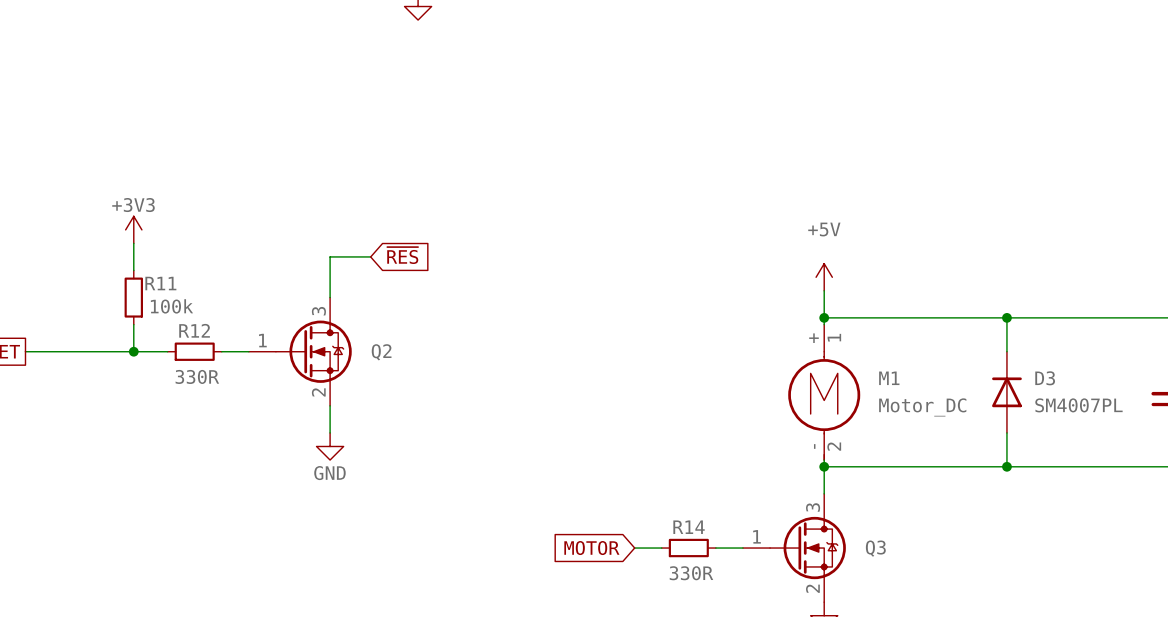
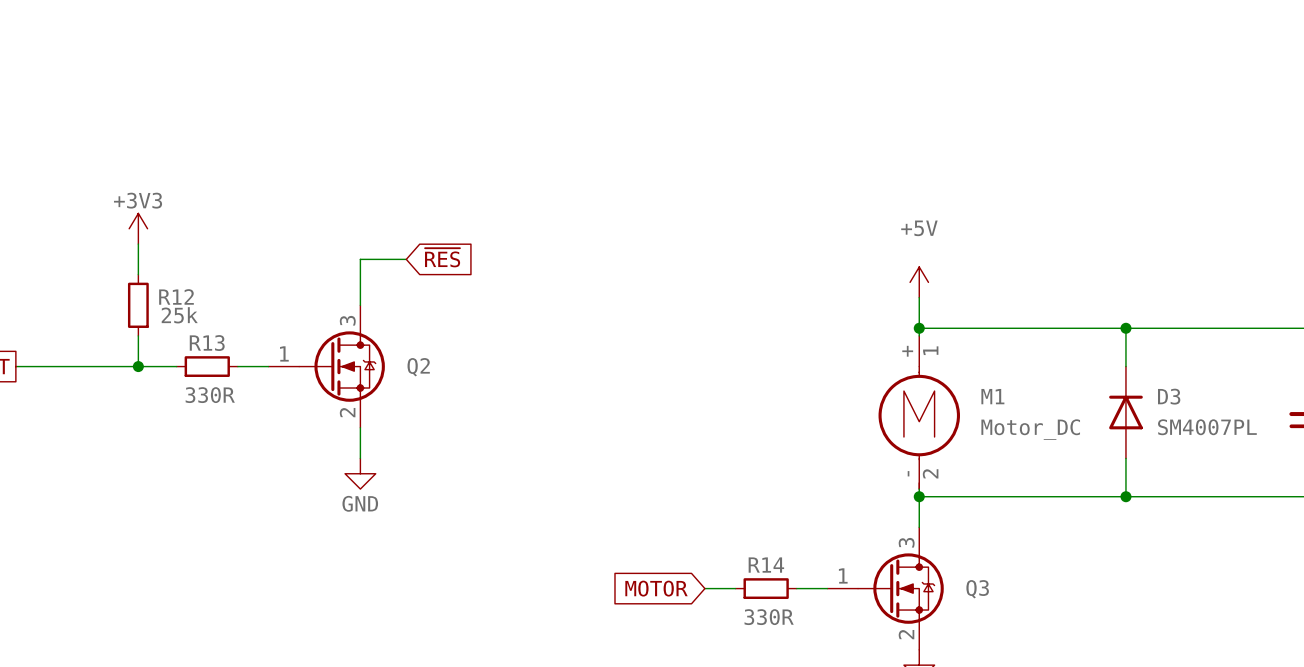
R11 name: R11 (160, 283) -> R12 (176, 296)
R11 value: 100k (171, 306) -> 25k (179, 315)
R12 name: R12 (194, 330) -> R13 (207, 343)

